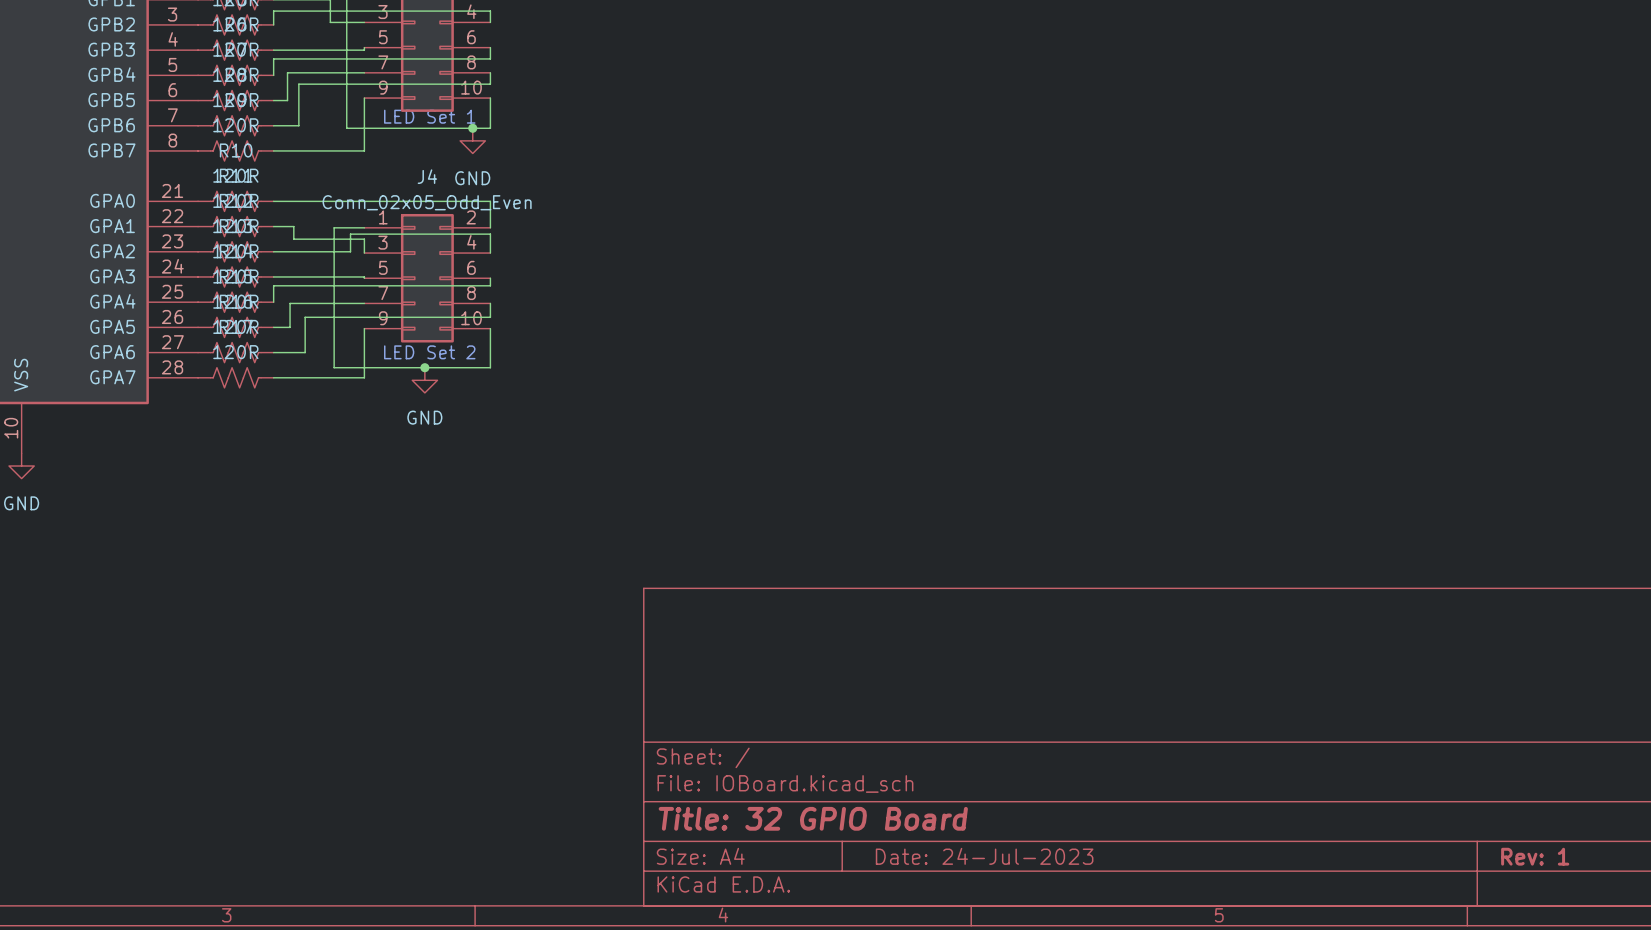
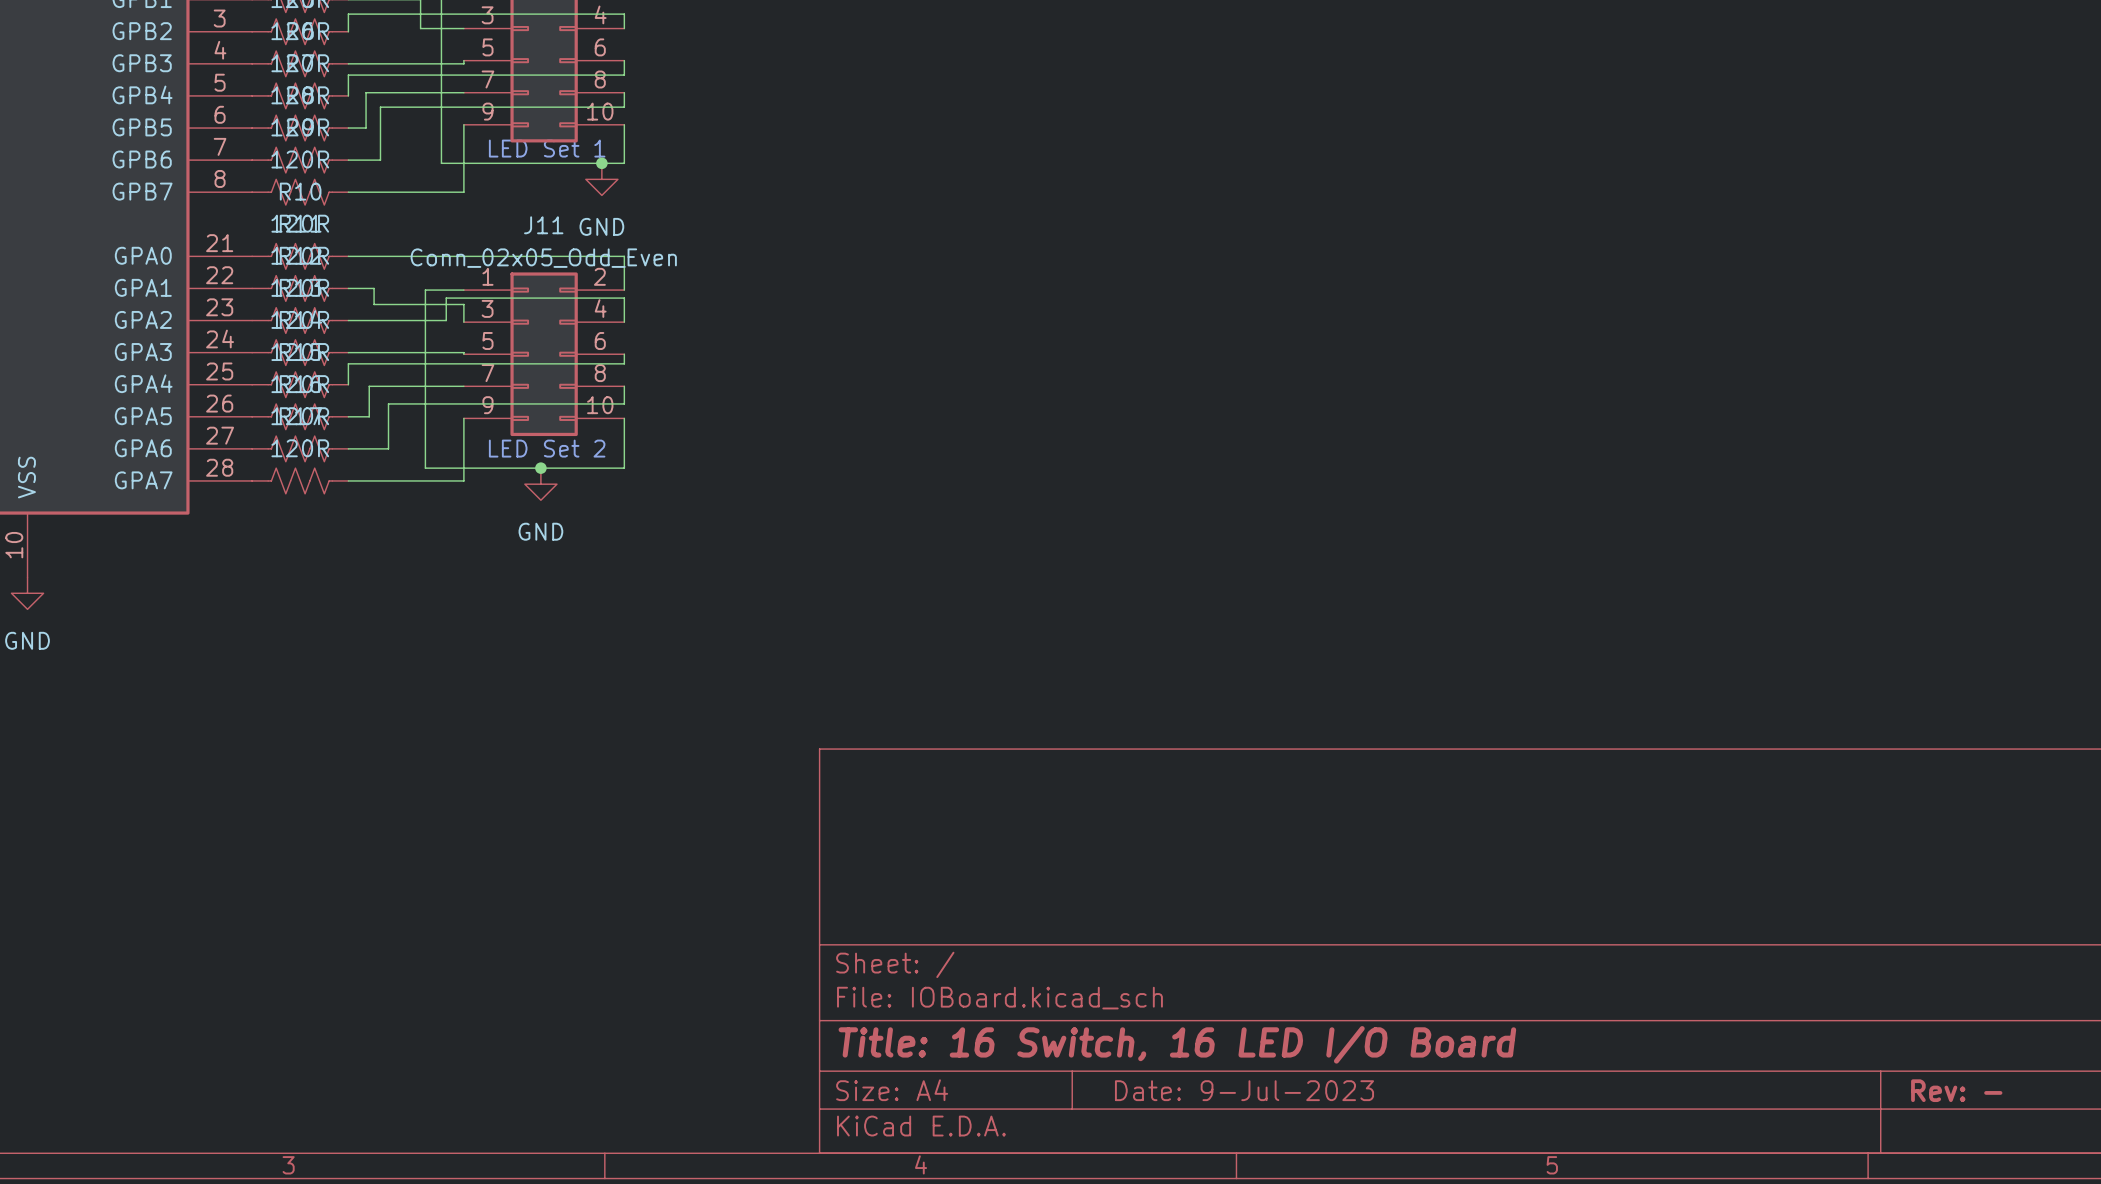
J4 name: J4 (427, 176) -> J11 (543, 225)
title block: Title: 32 GPIO Board (813, 818) -> Title: 16 Switch, 16 LED I/O Board (1177, 1044)
title block: Date: 24-Jul-2023 (984, 856) -> Date: 9-Jul-2023 (1244, 1090)
title block: Rev: 1 (1535, 856) -> Rev: - (1956, 1090)

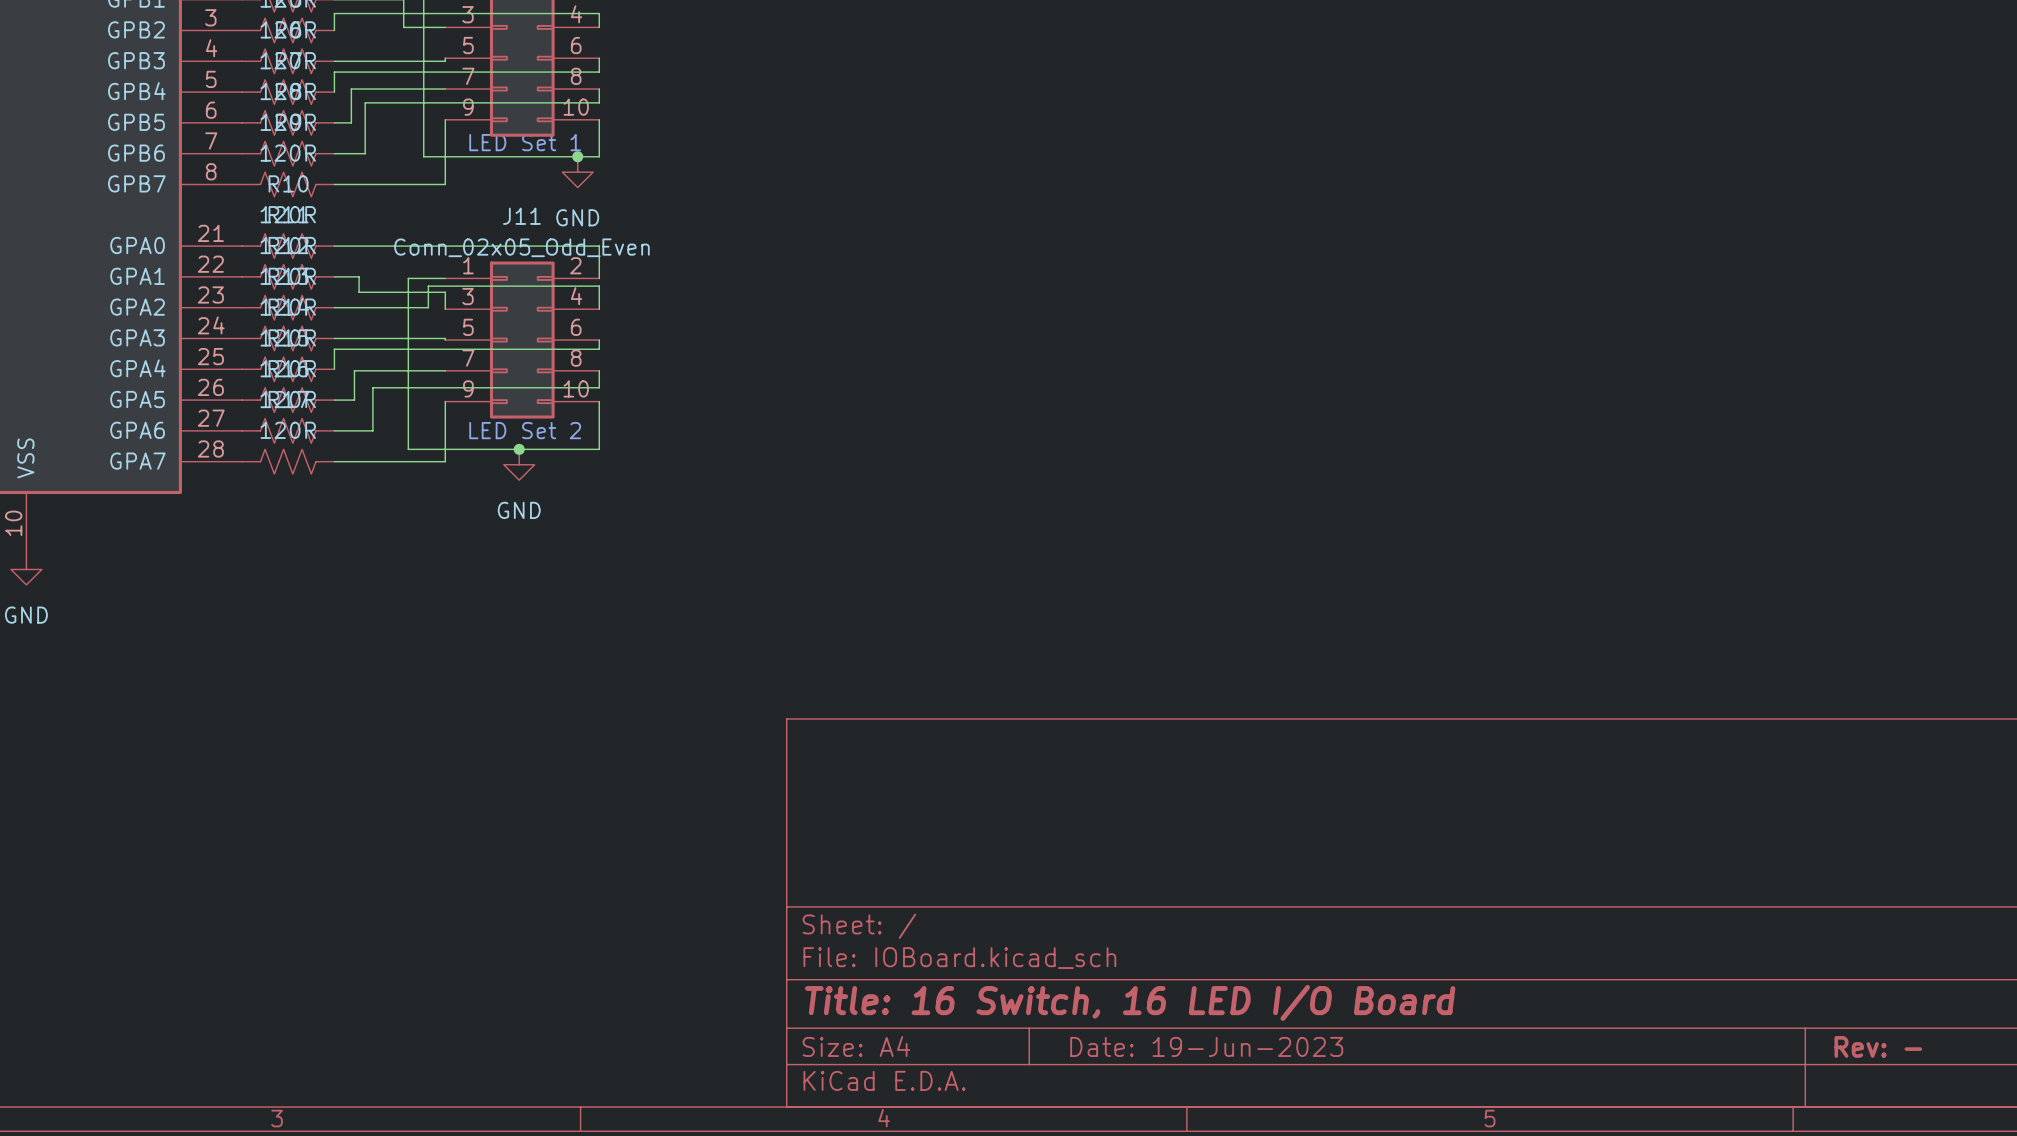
title block: Date: 9-Jul-2023 (1244, 1090) -> Date: 19-Jun-2023 (1206, 1046)

